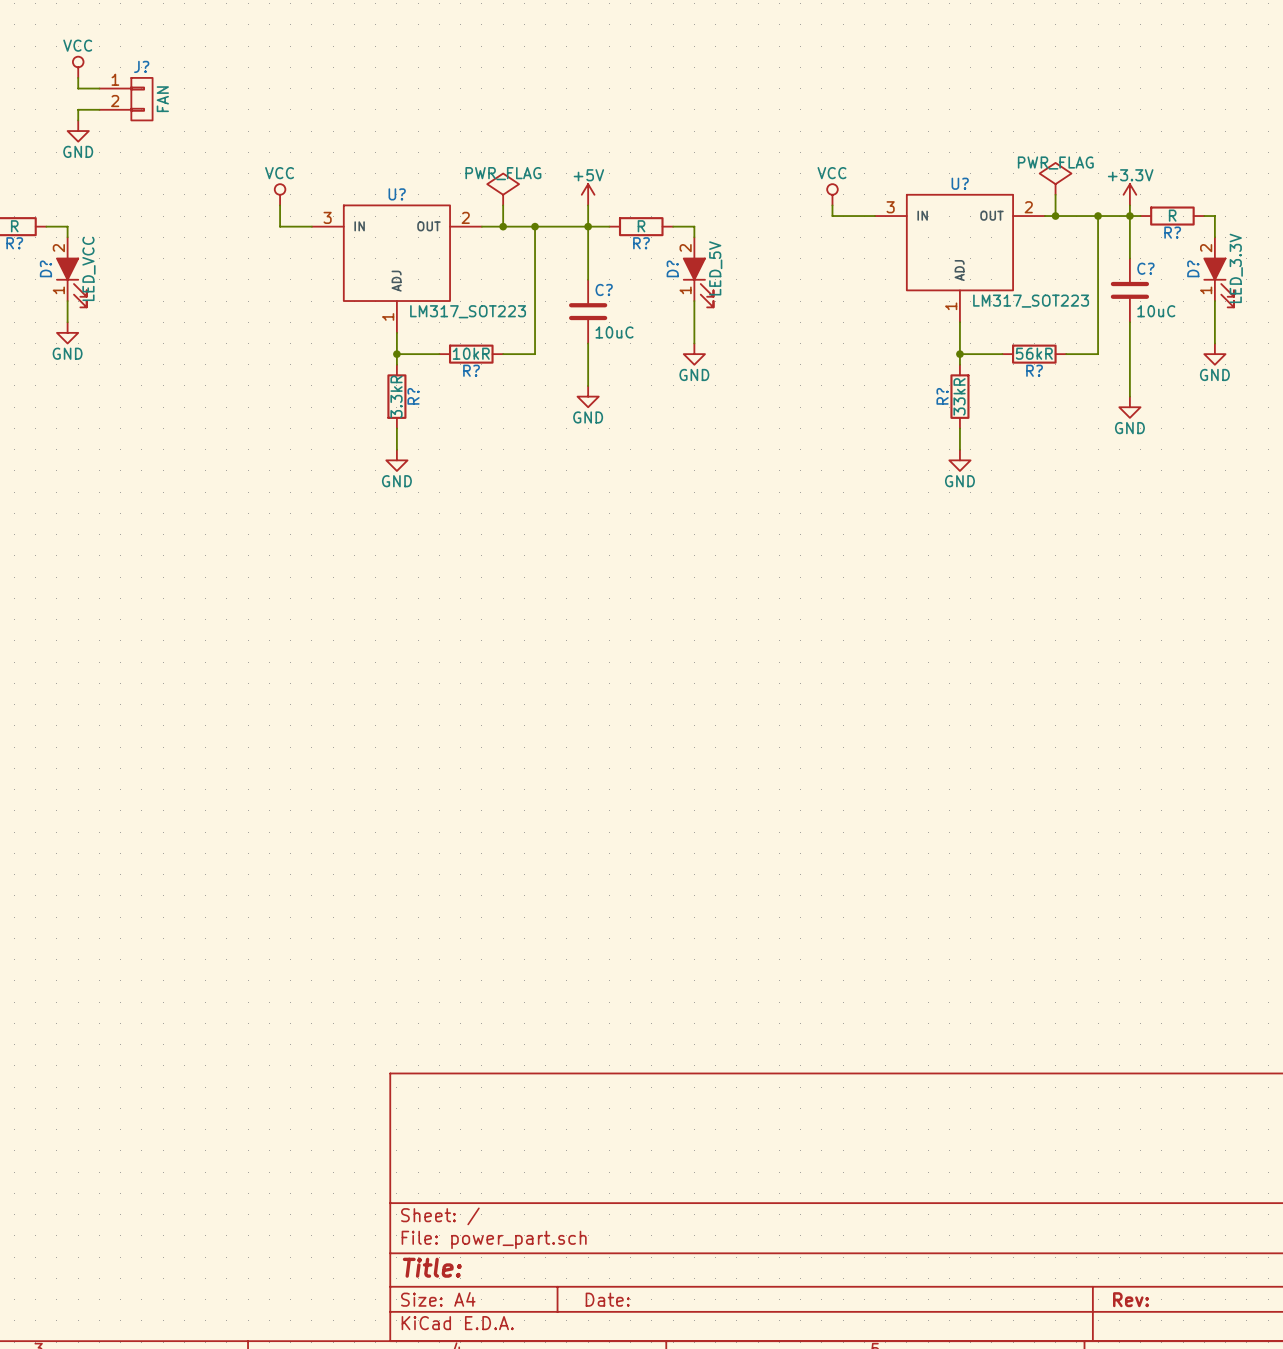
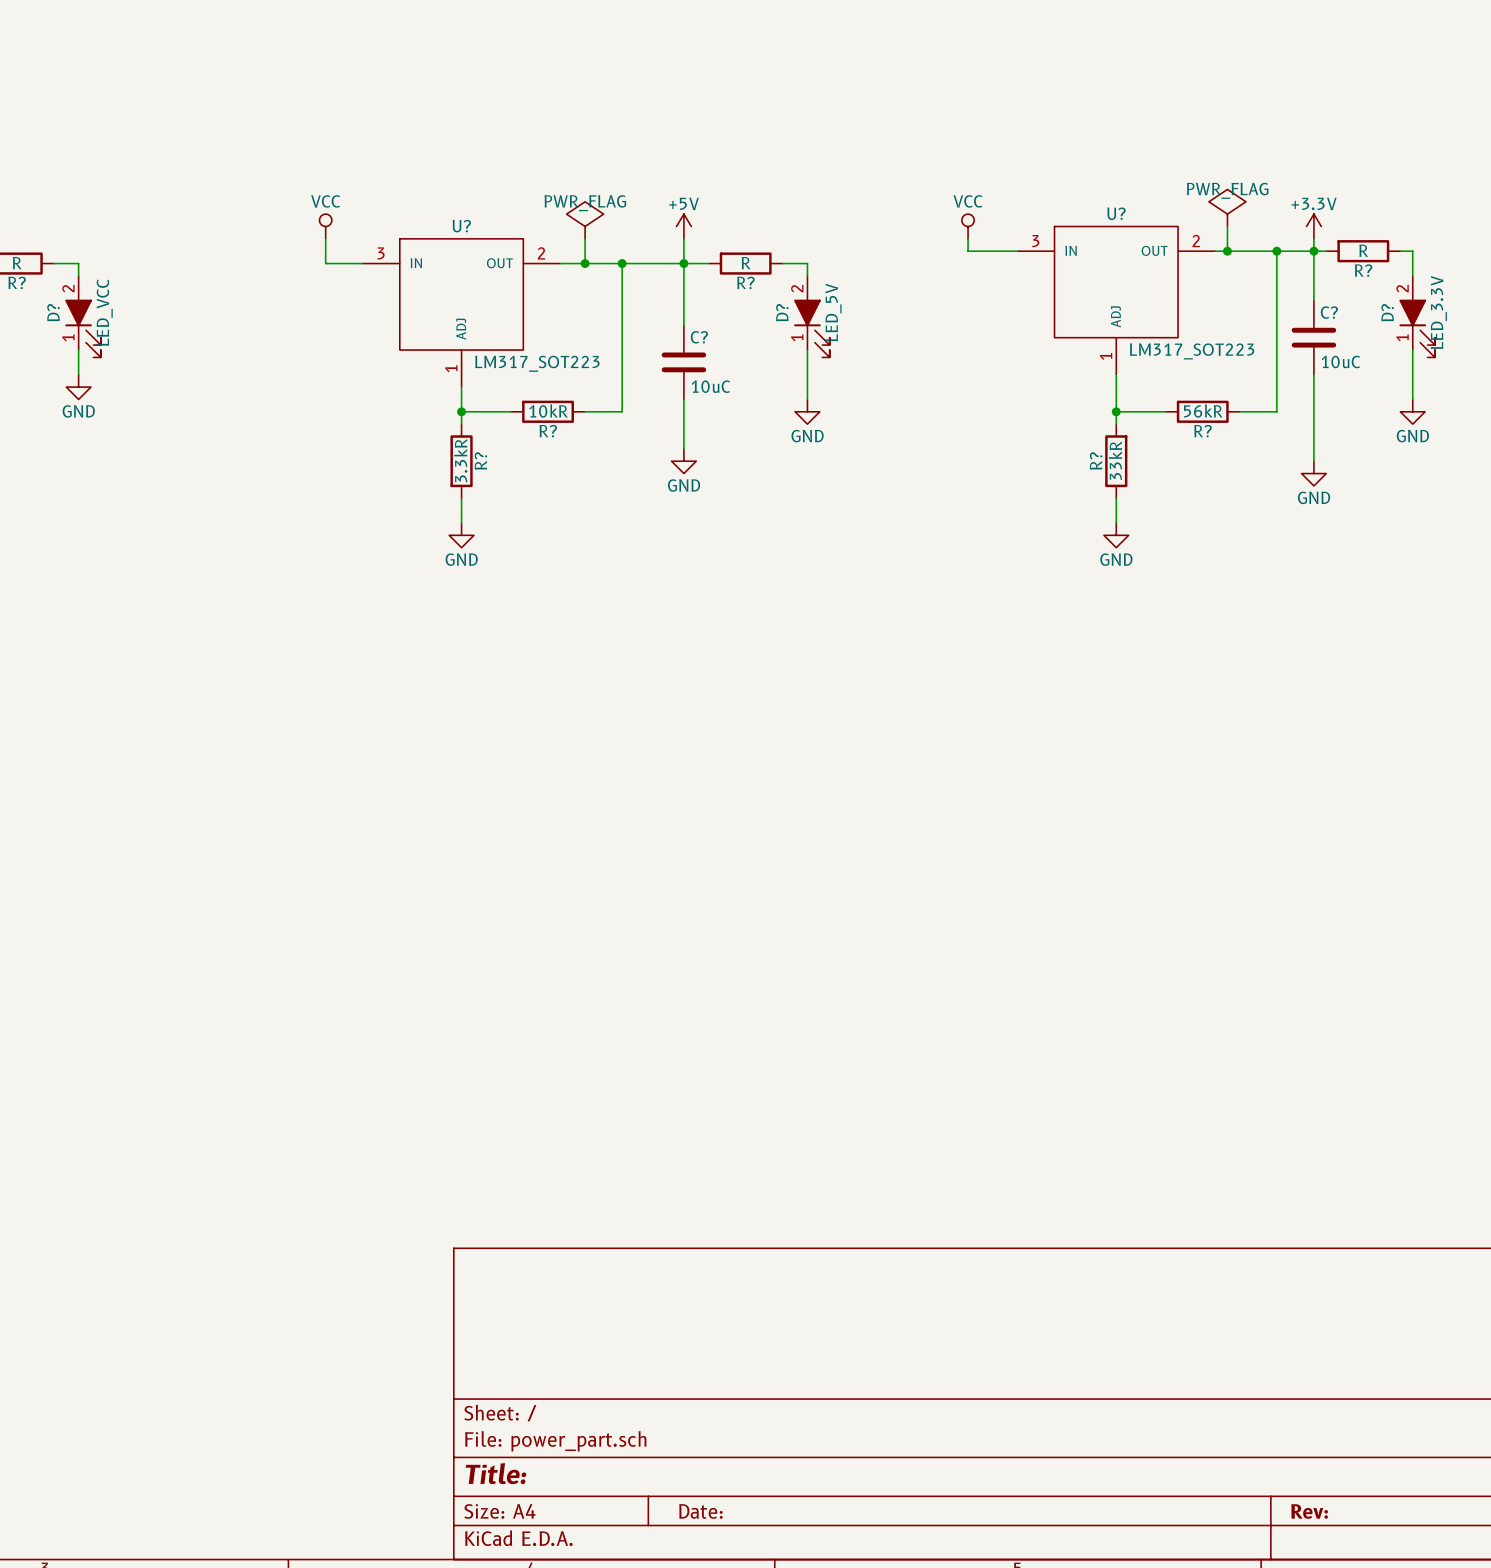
power symbol: VCC (78, 67) -> none
wire: (78, 77) (78, 88) (99, 88) -> none
J?: FAN (126, 99) -> none
wire: (99, 109) (78, 109) (78, 120) -> none
power symbol: GND (78, 131) -> none

